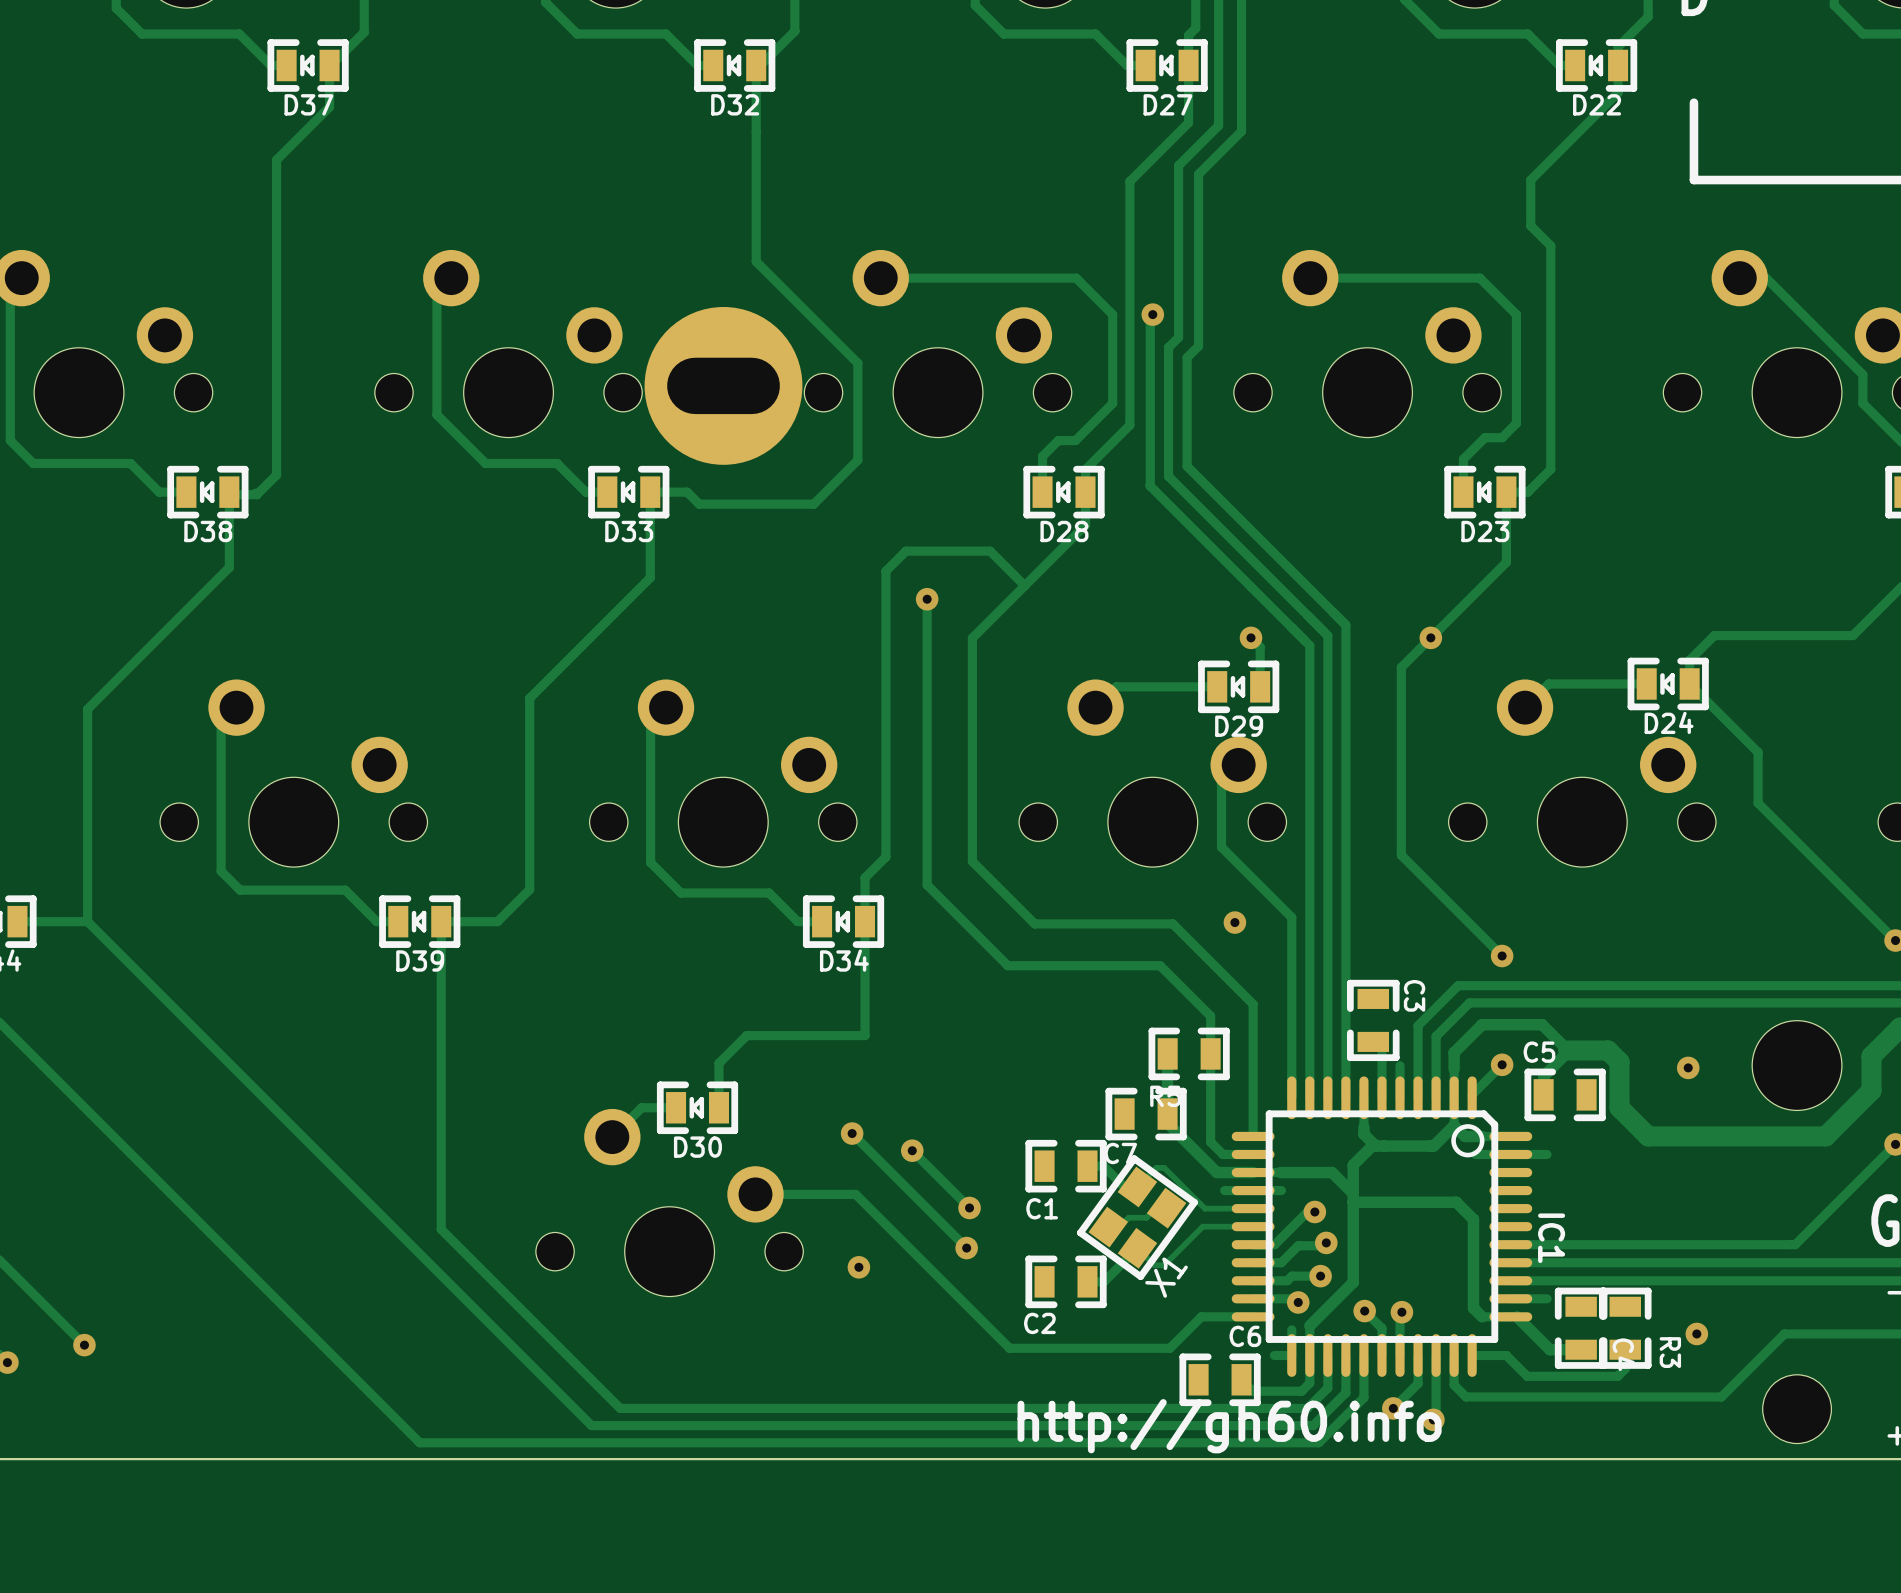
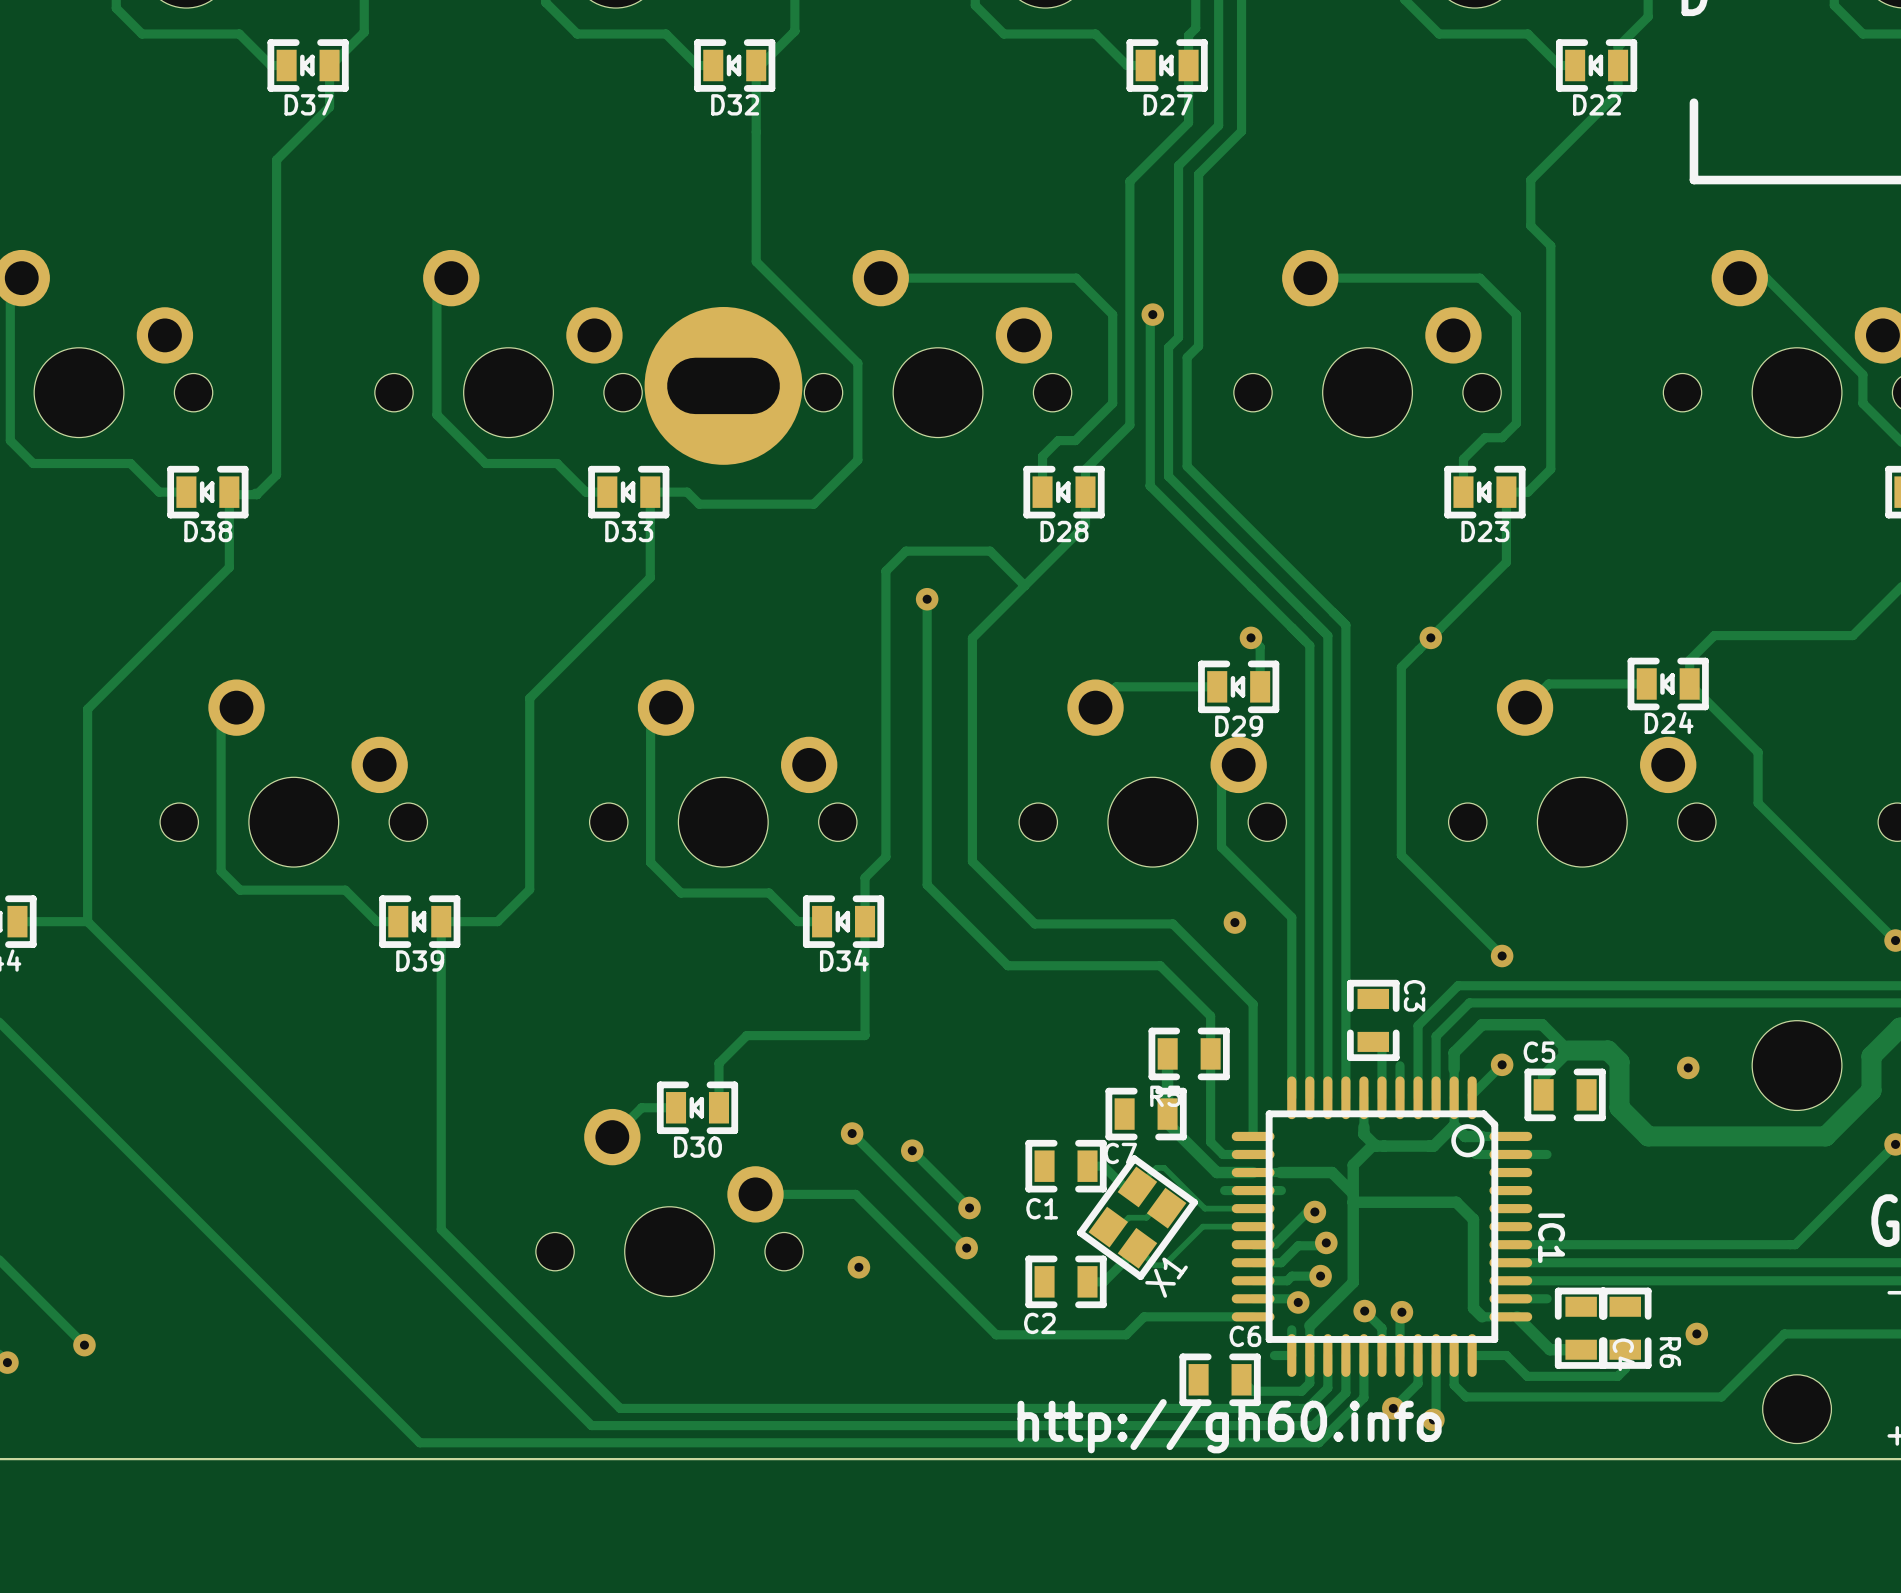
track: (1201, 1316) (1169, 1348) (1009, 1348) (996, 1334) -> (1201, 1316) (1144, 1316) (1126, 1334) (996, 1334)
R3 name: R3 (1670, 1352) -> R6 (1670, 1352)

